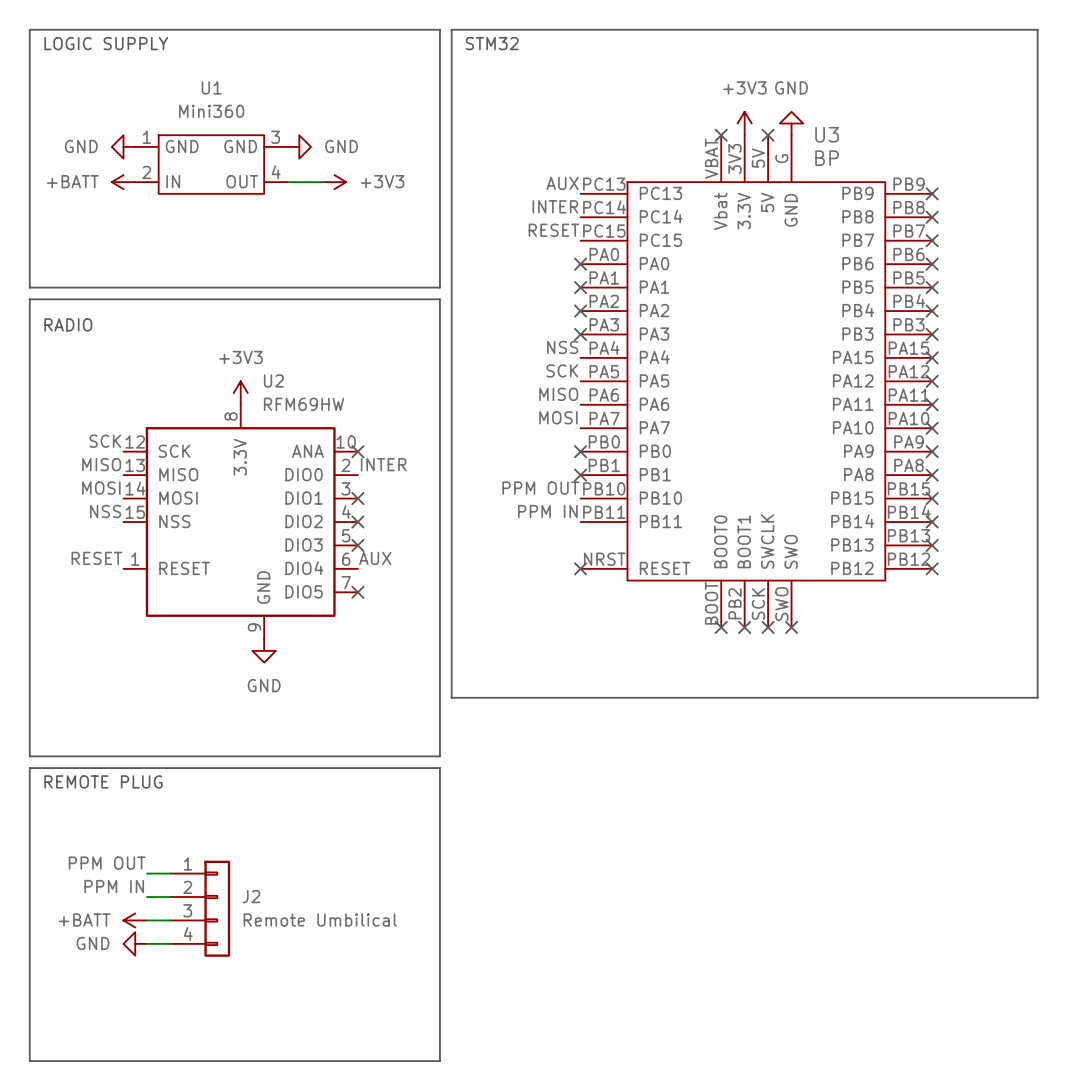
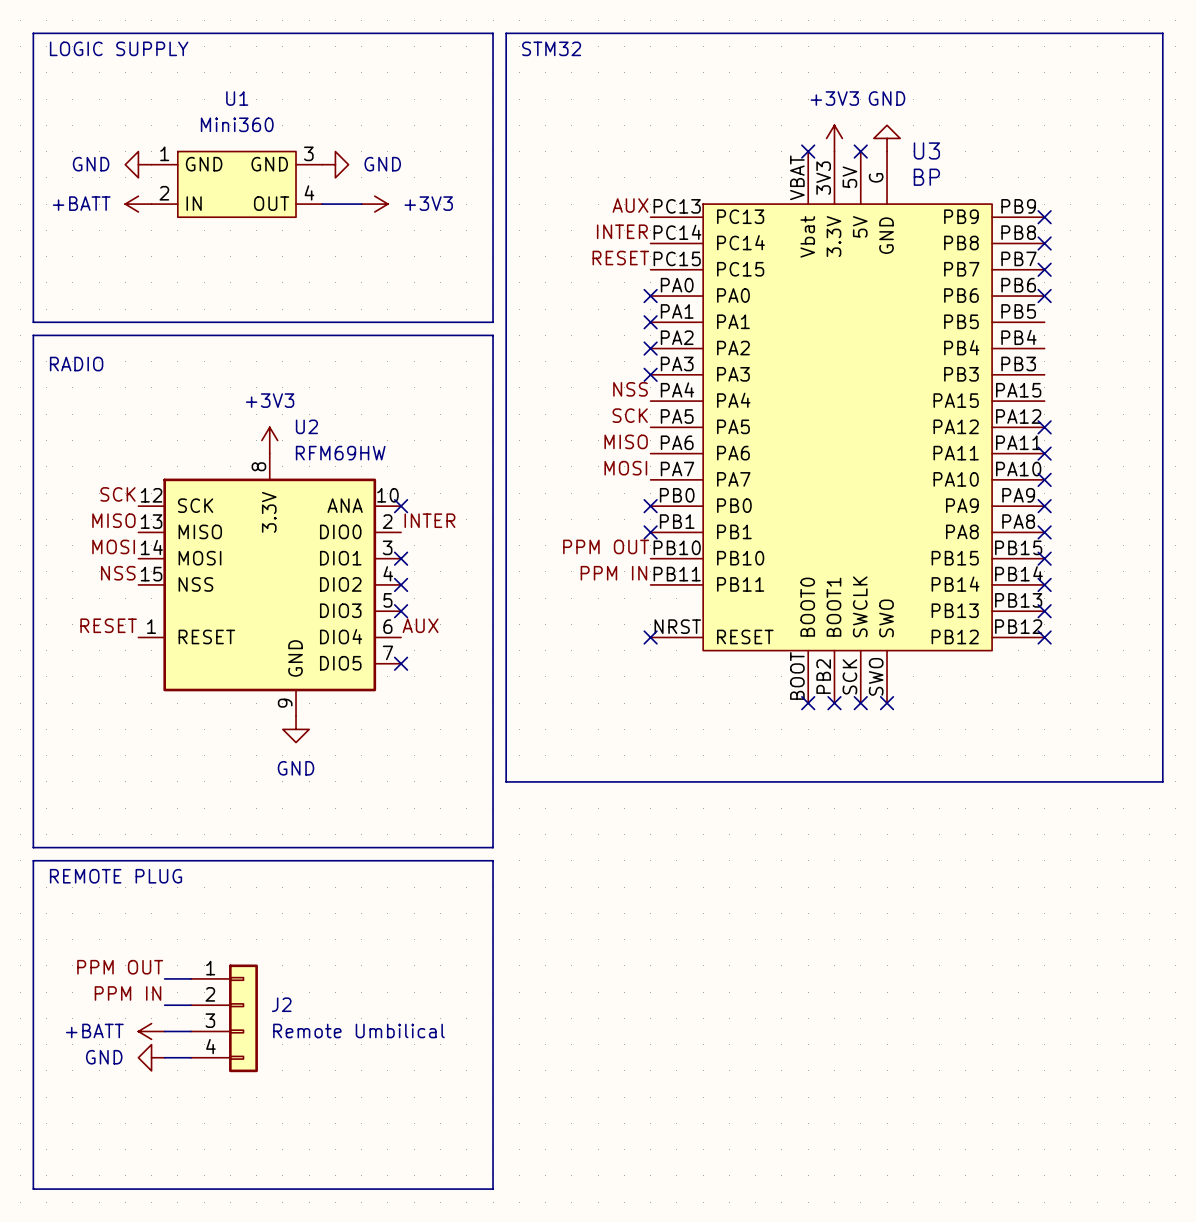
no-connect mark: (932, 287) -> none
no-connect mark: (932, 311) -> none
no-connect mark: (932, 334) -> none
no-connect mark: (932, 357) -> none

